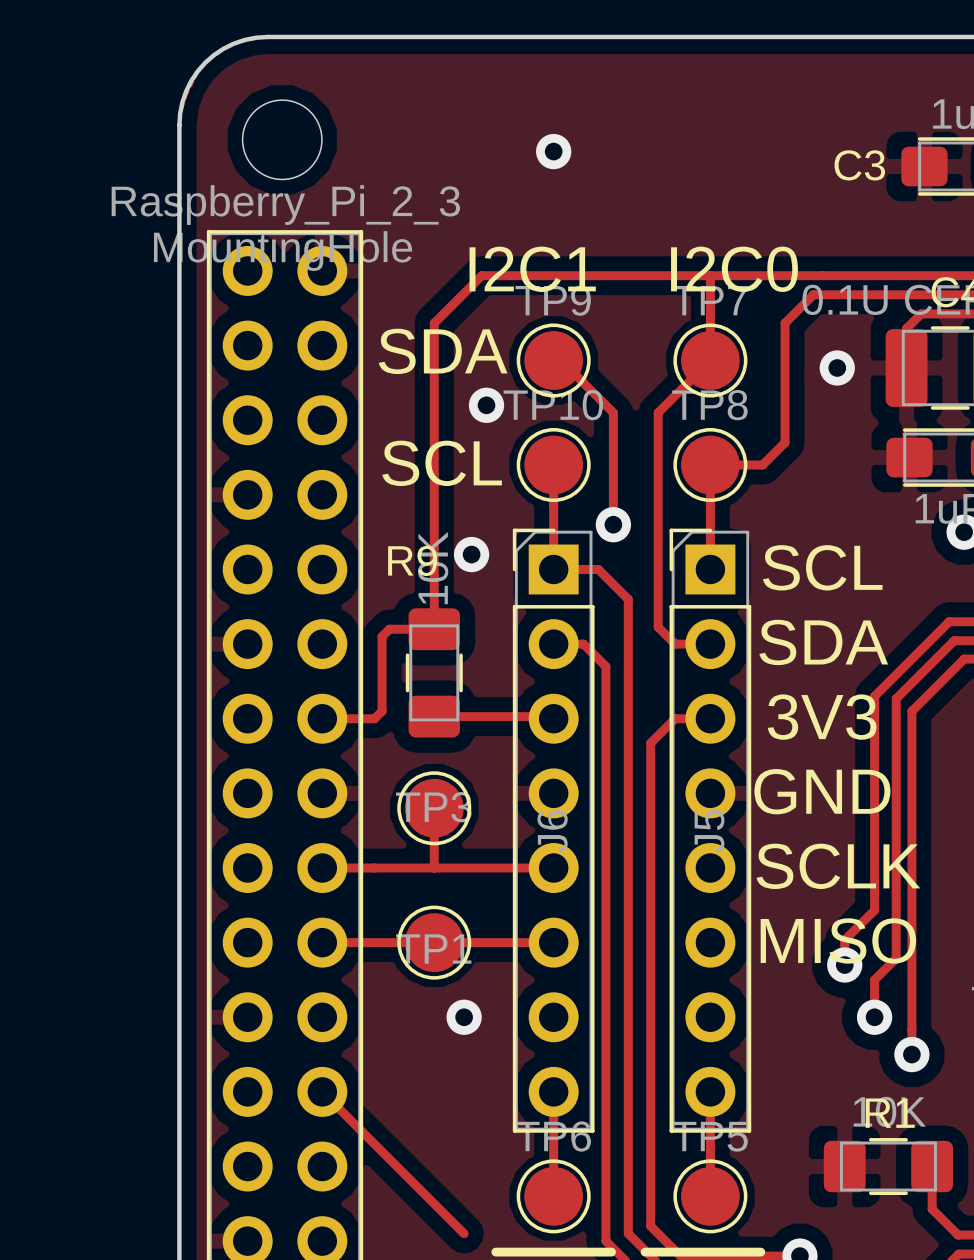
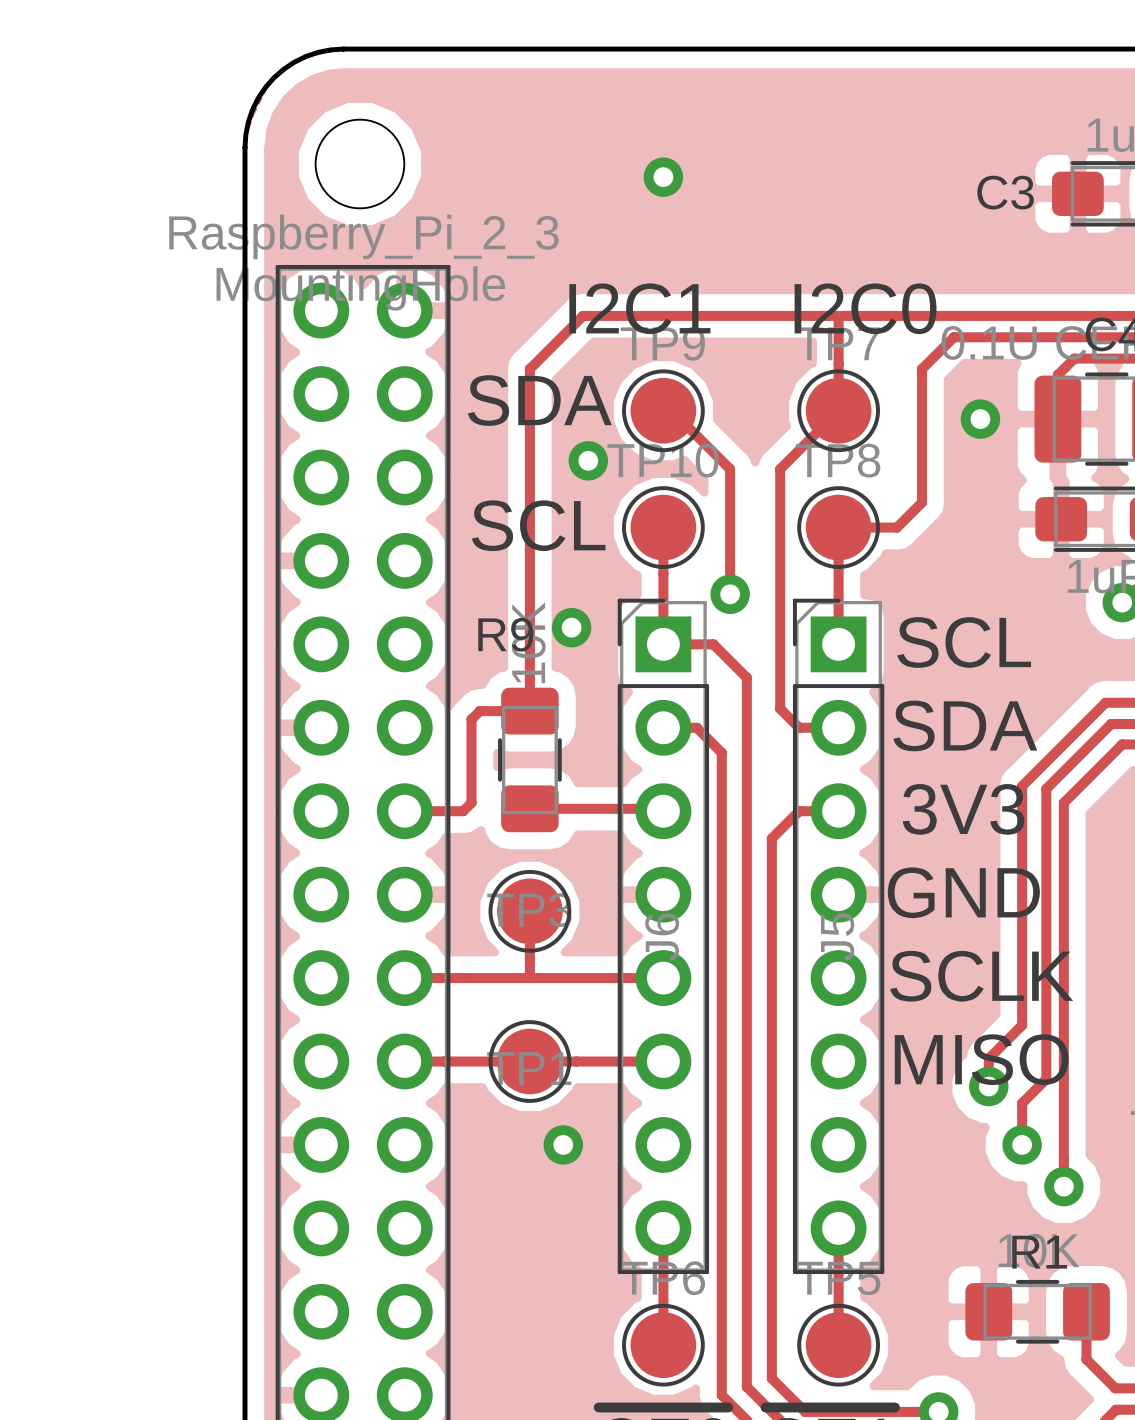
track: (322, 1091) (464, 1233) -> none

